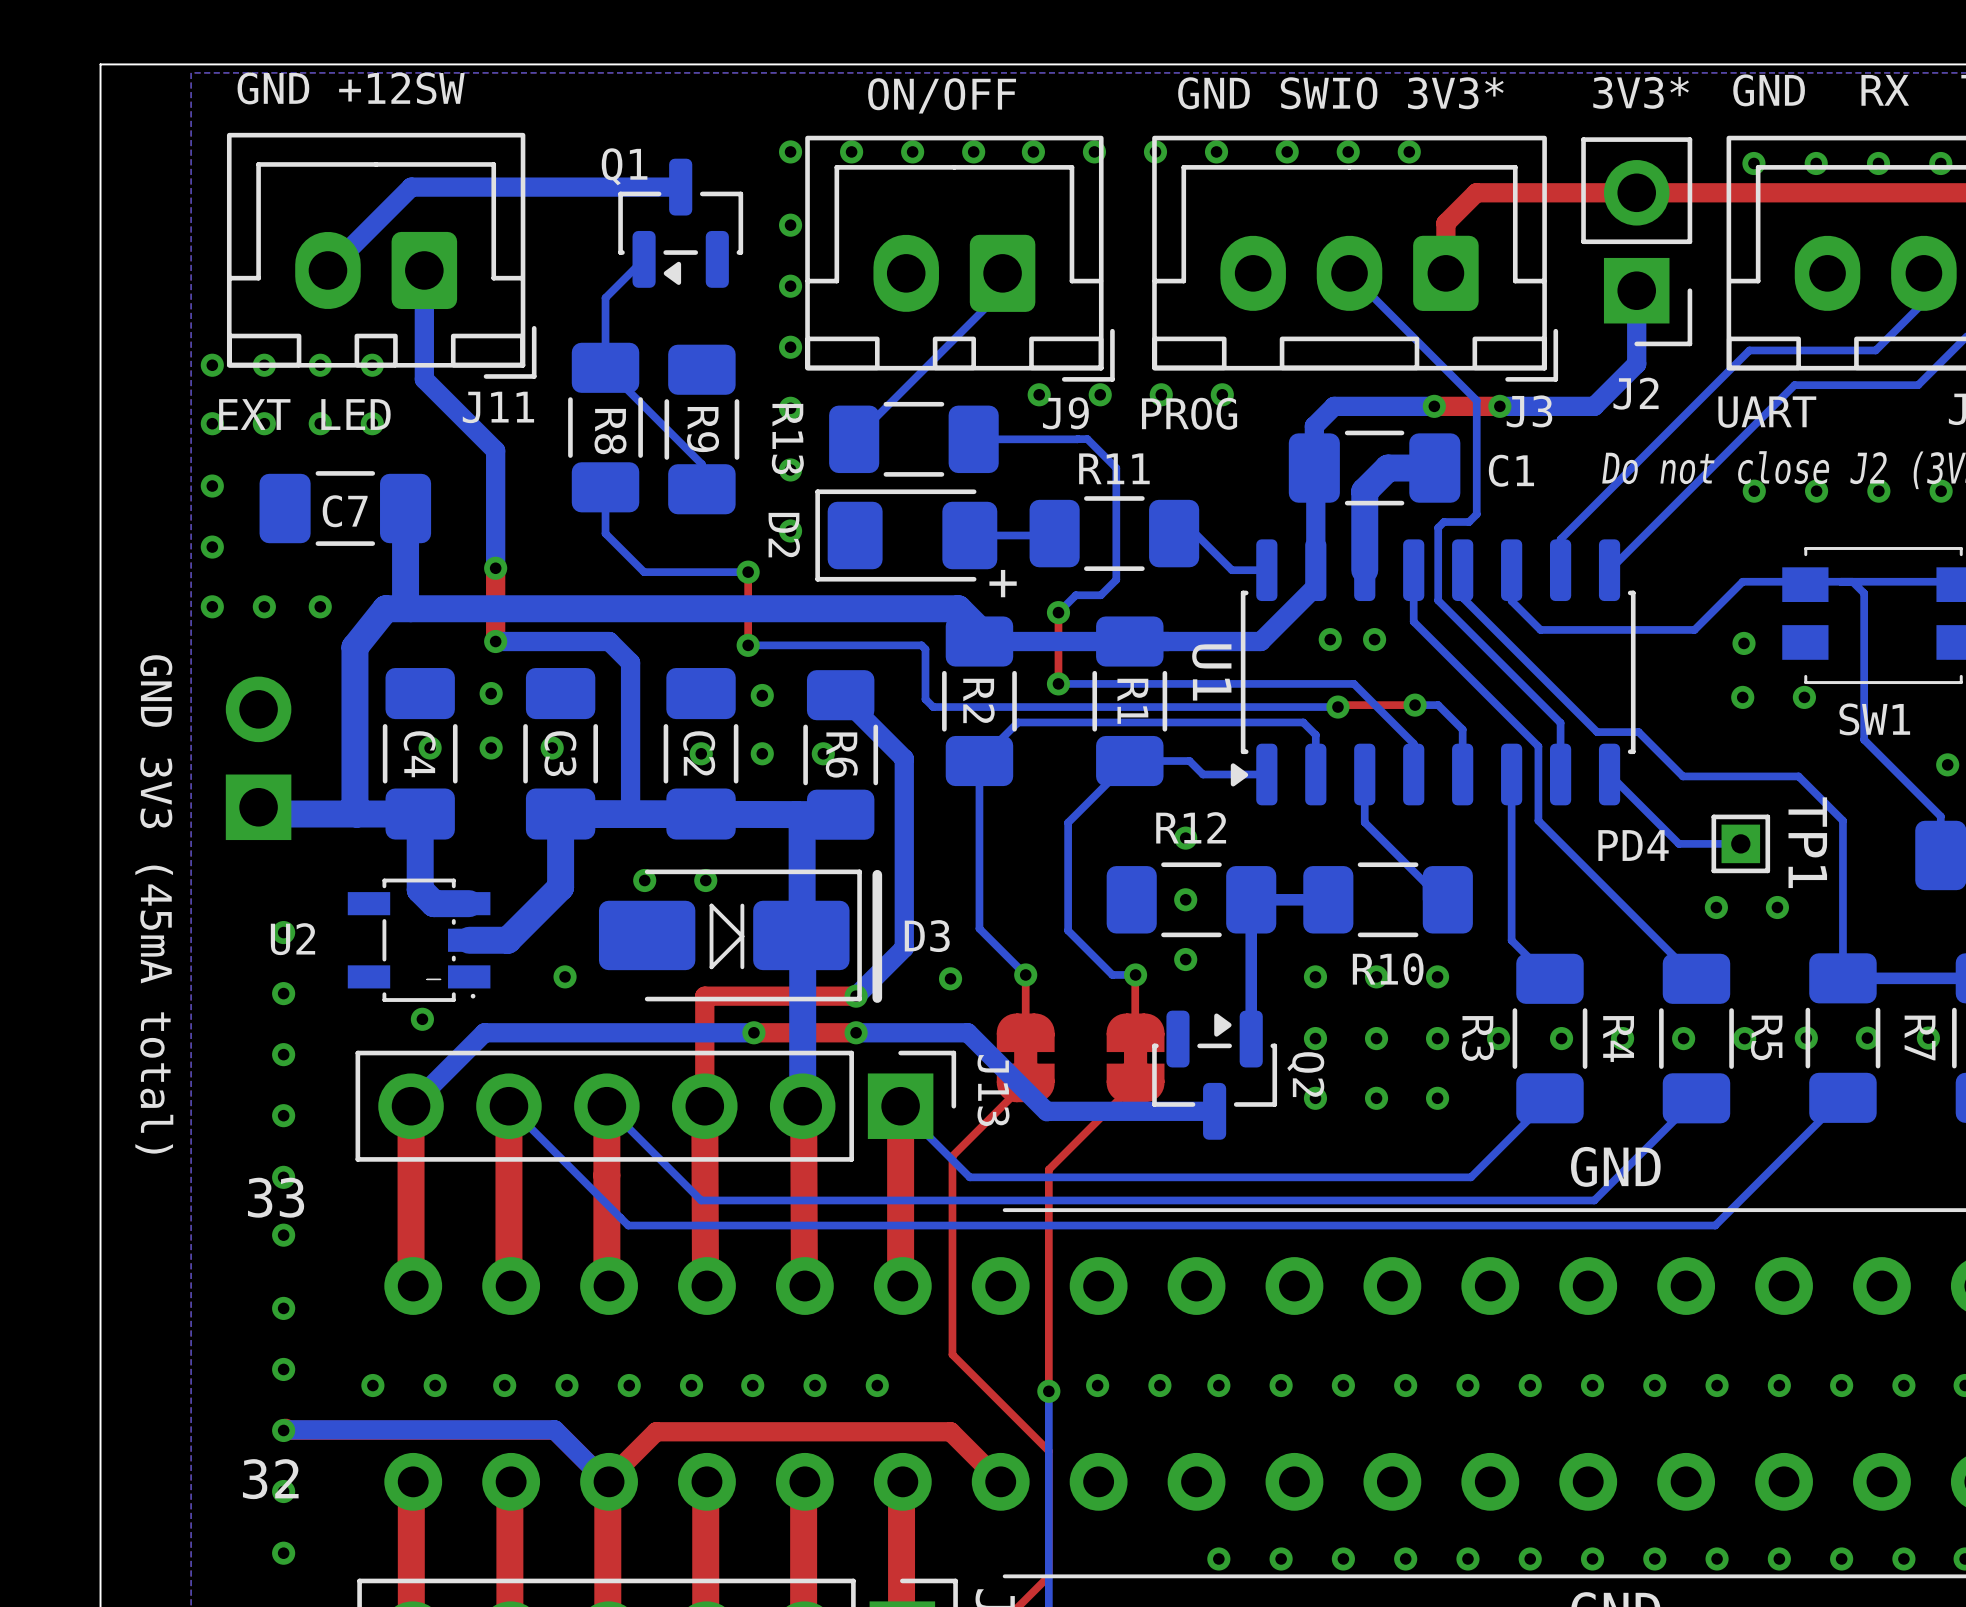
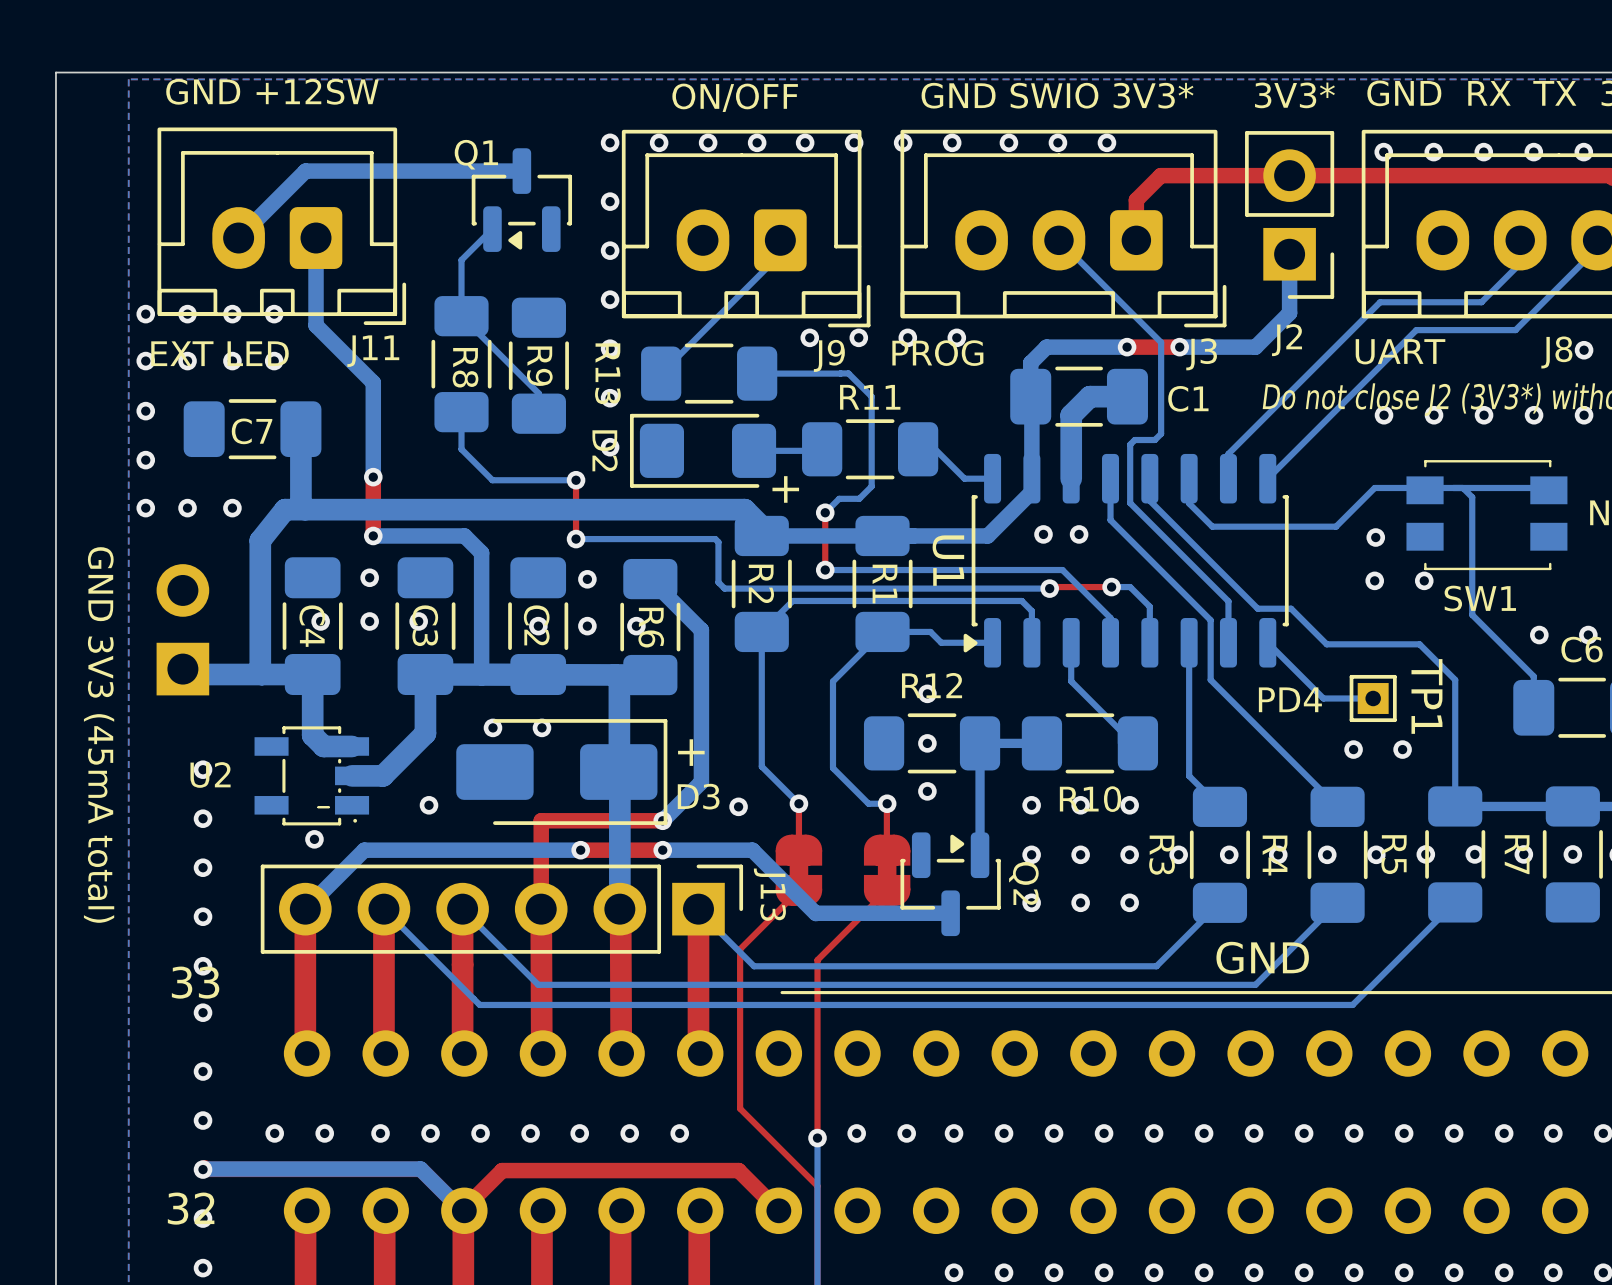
line: (877, 874) (877, 998) -> none
line: (711, 905) (742, 936) (711, 967) (711, 905) -> none
line: (742, 905) (742, 967) -> none
text: none -> + (691, 752)
D3 name position: D3 (927, 936) -> D3 (698, 796)

